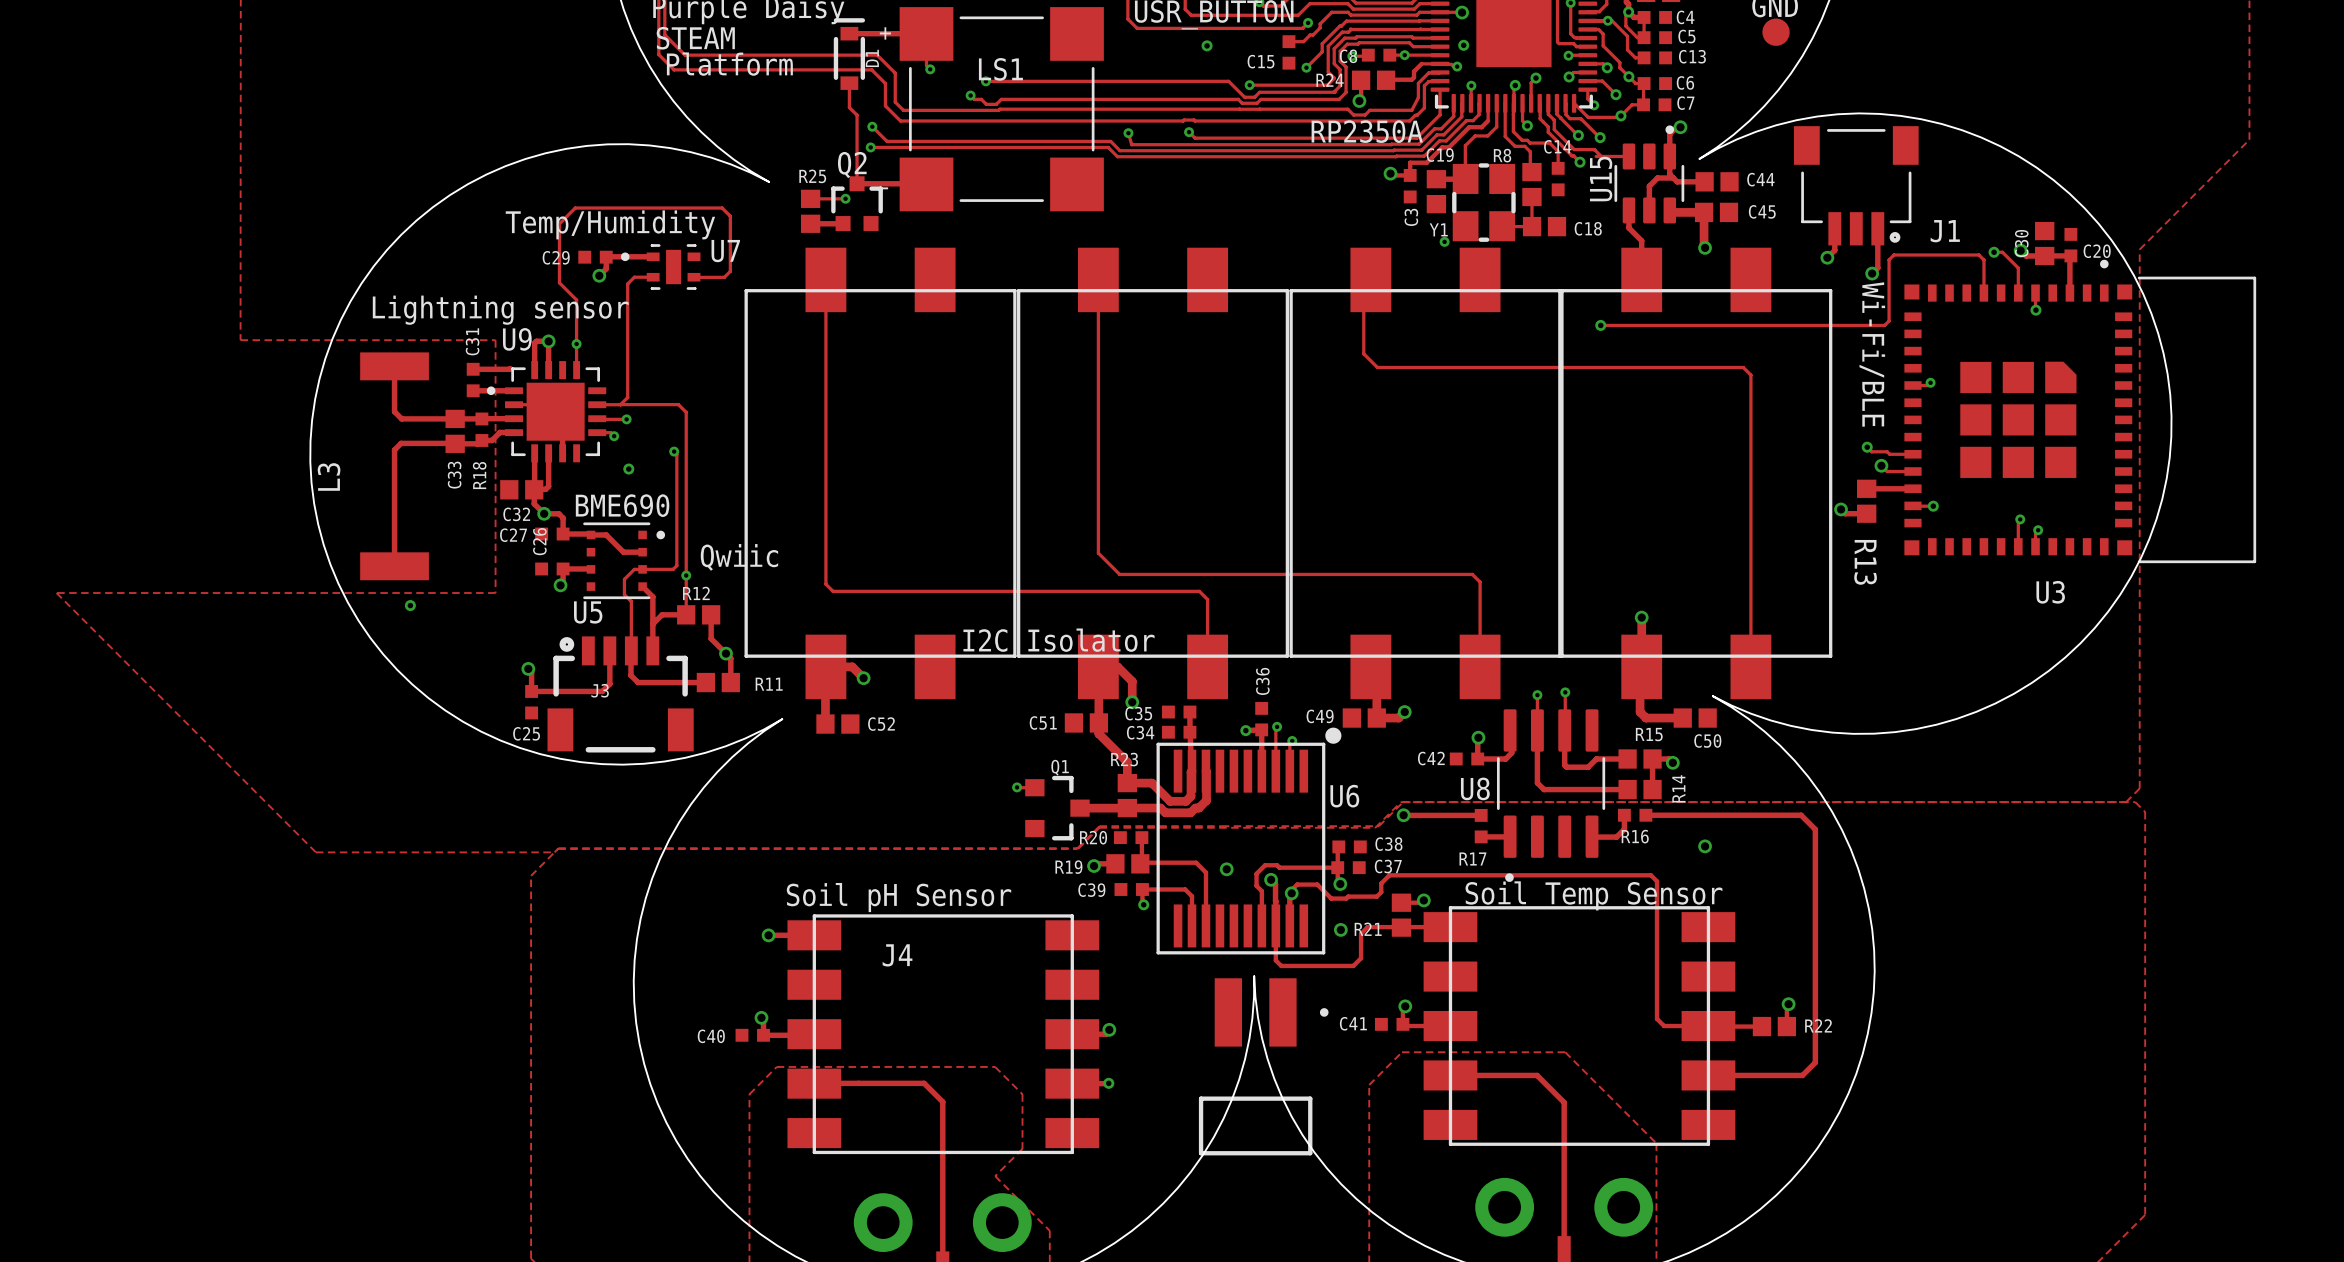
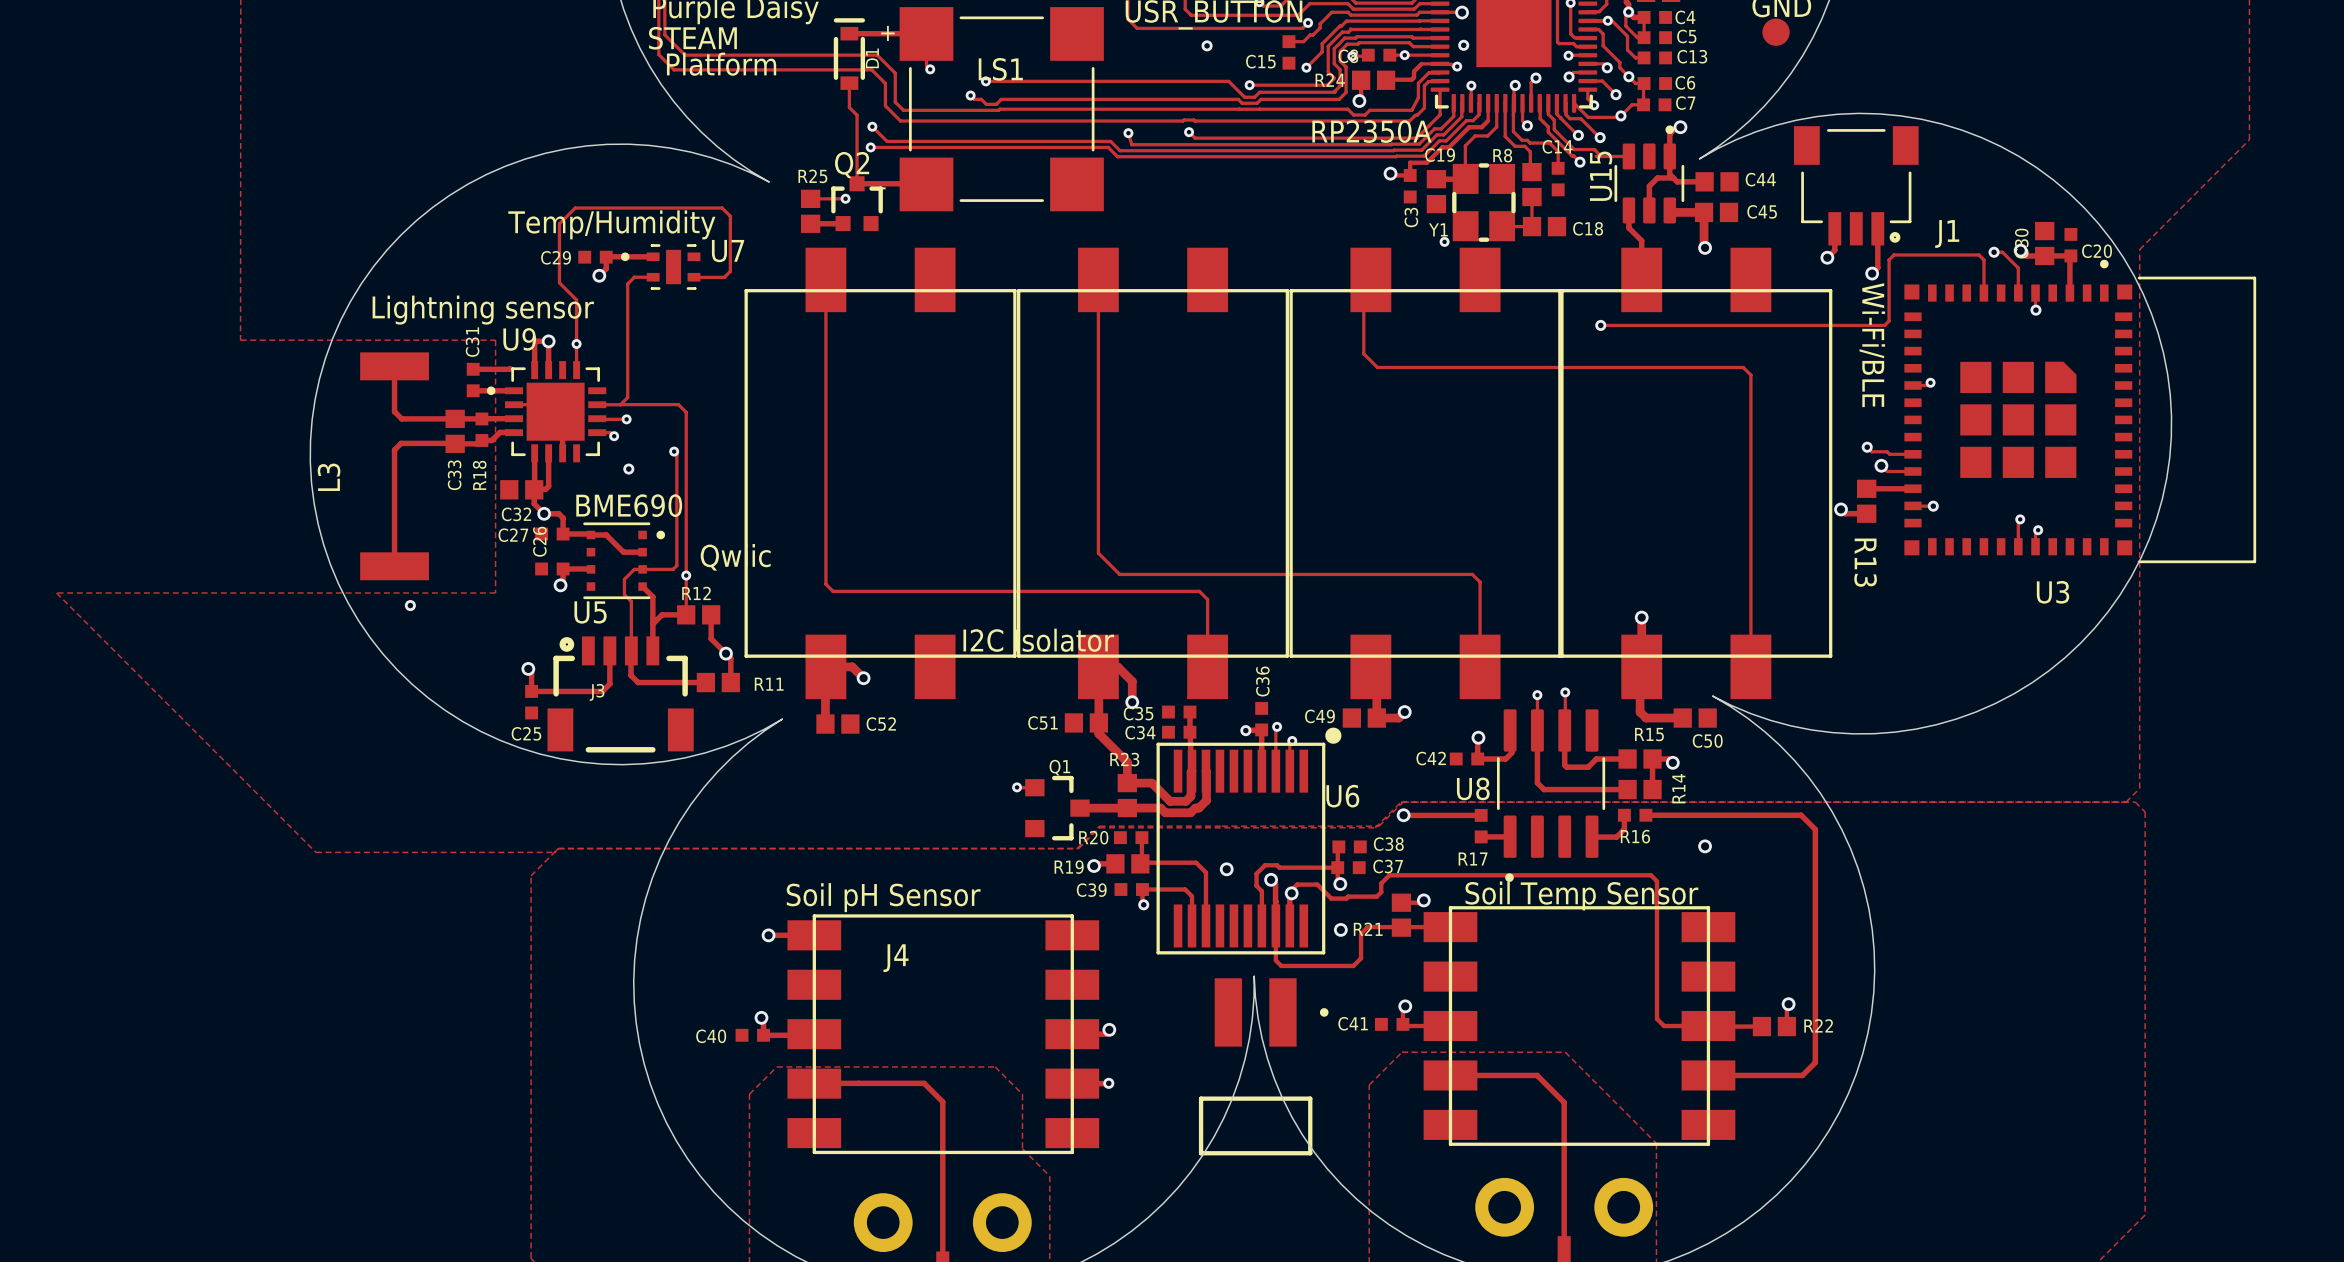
zone outline: (1022, 1148) (995, 1176) (1049, 1230) -> (1022, 1148) (1049, 1176) (1049, 1230)

